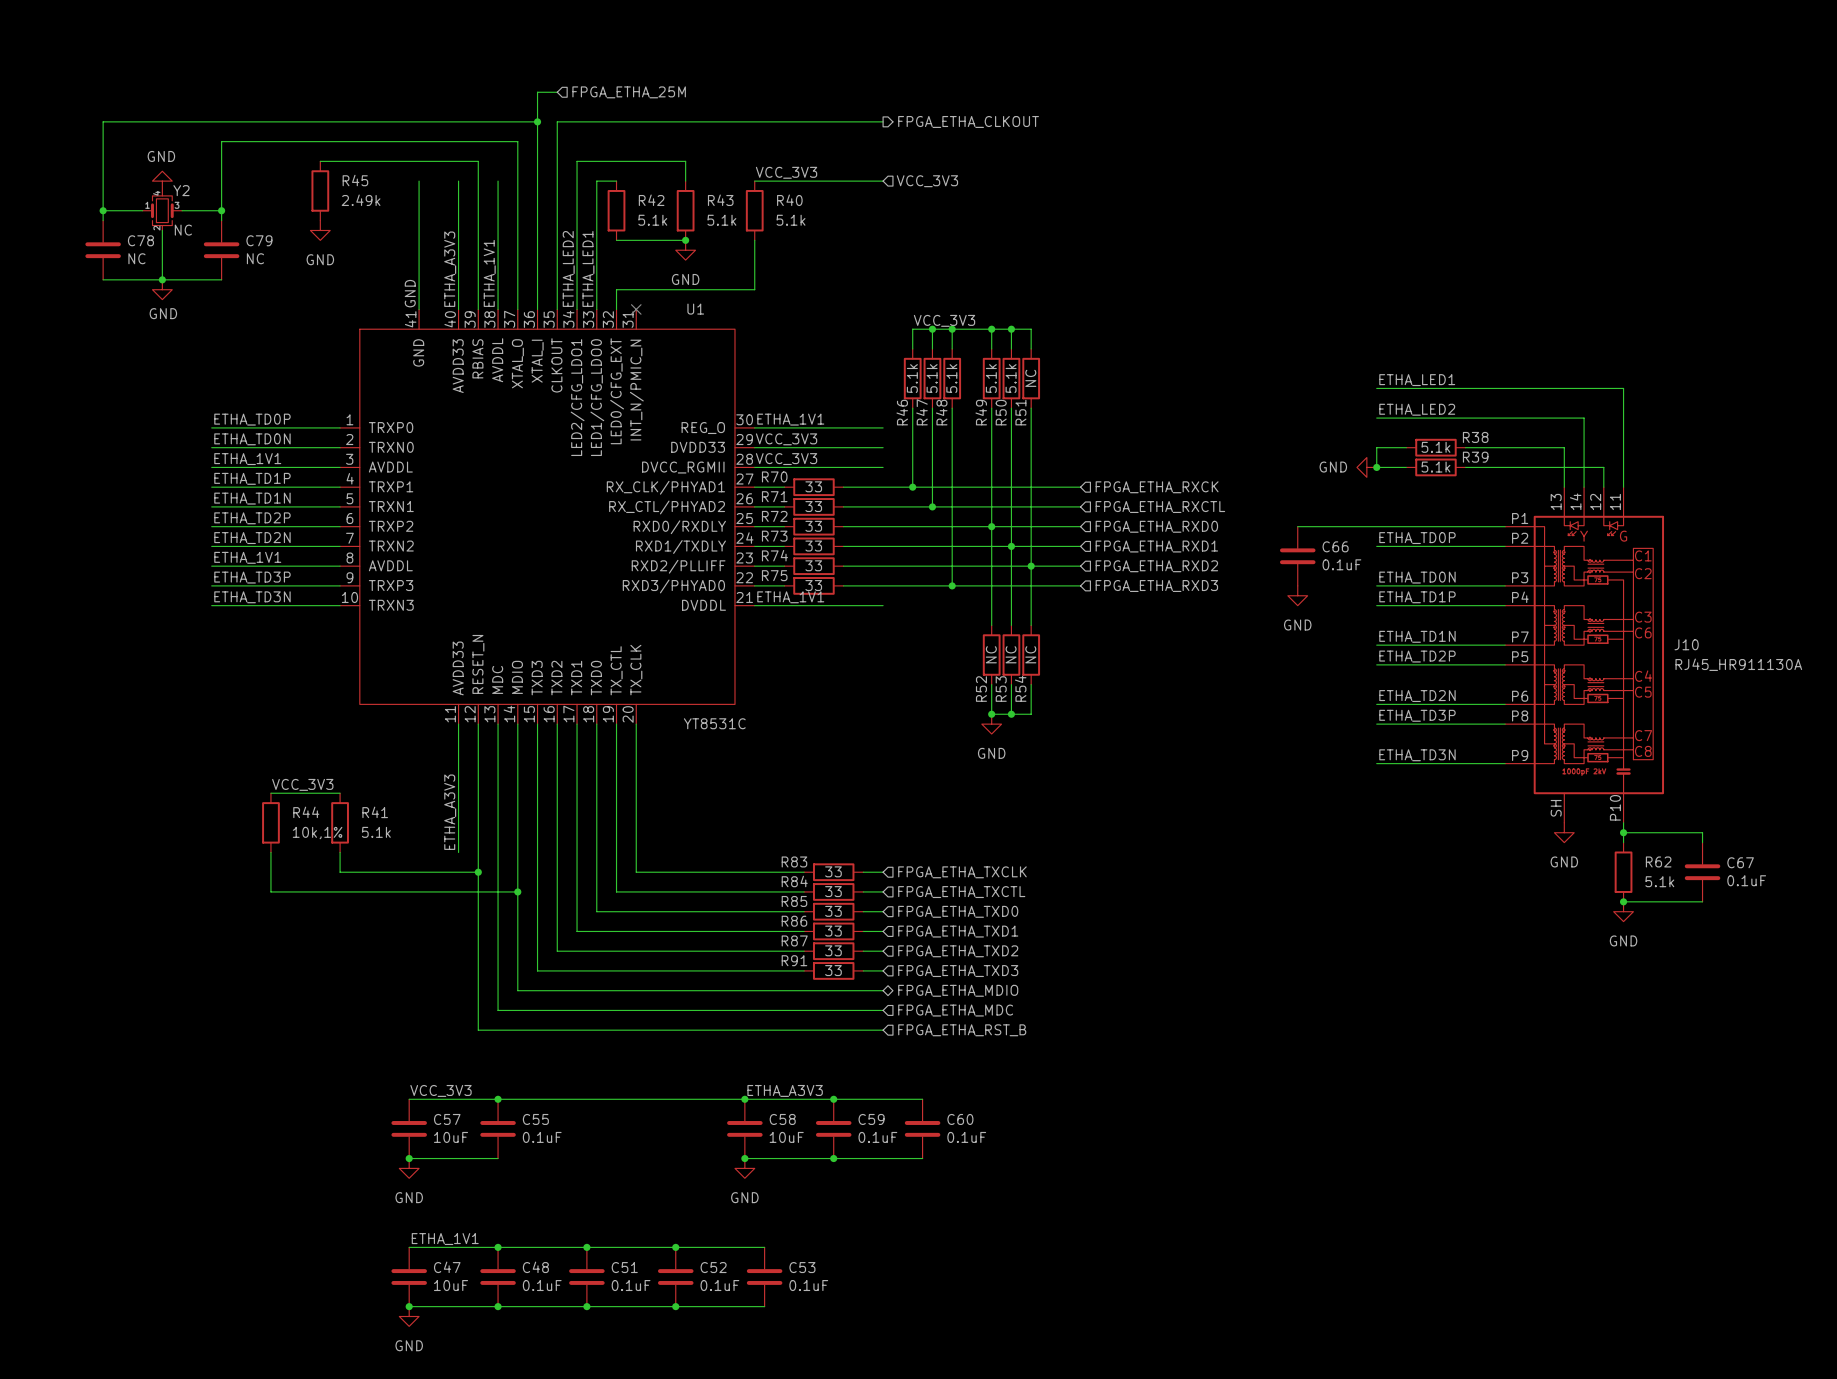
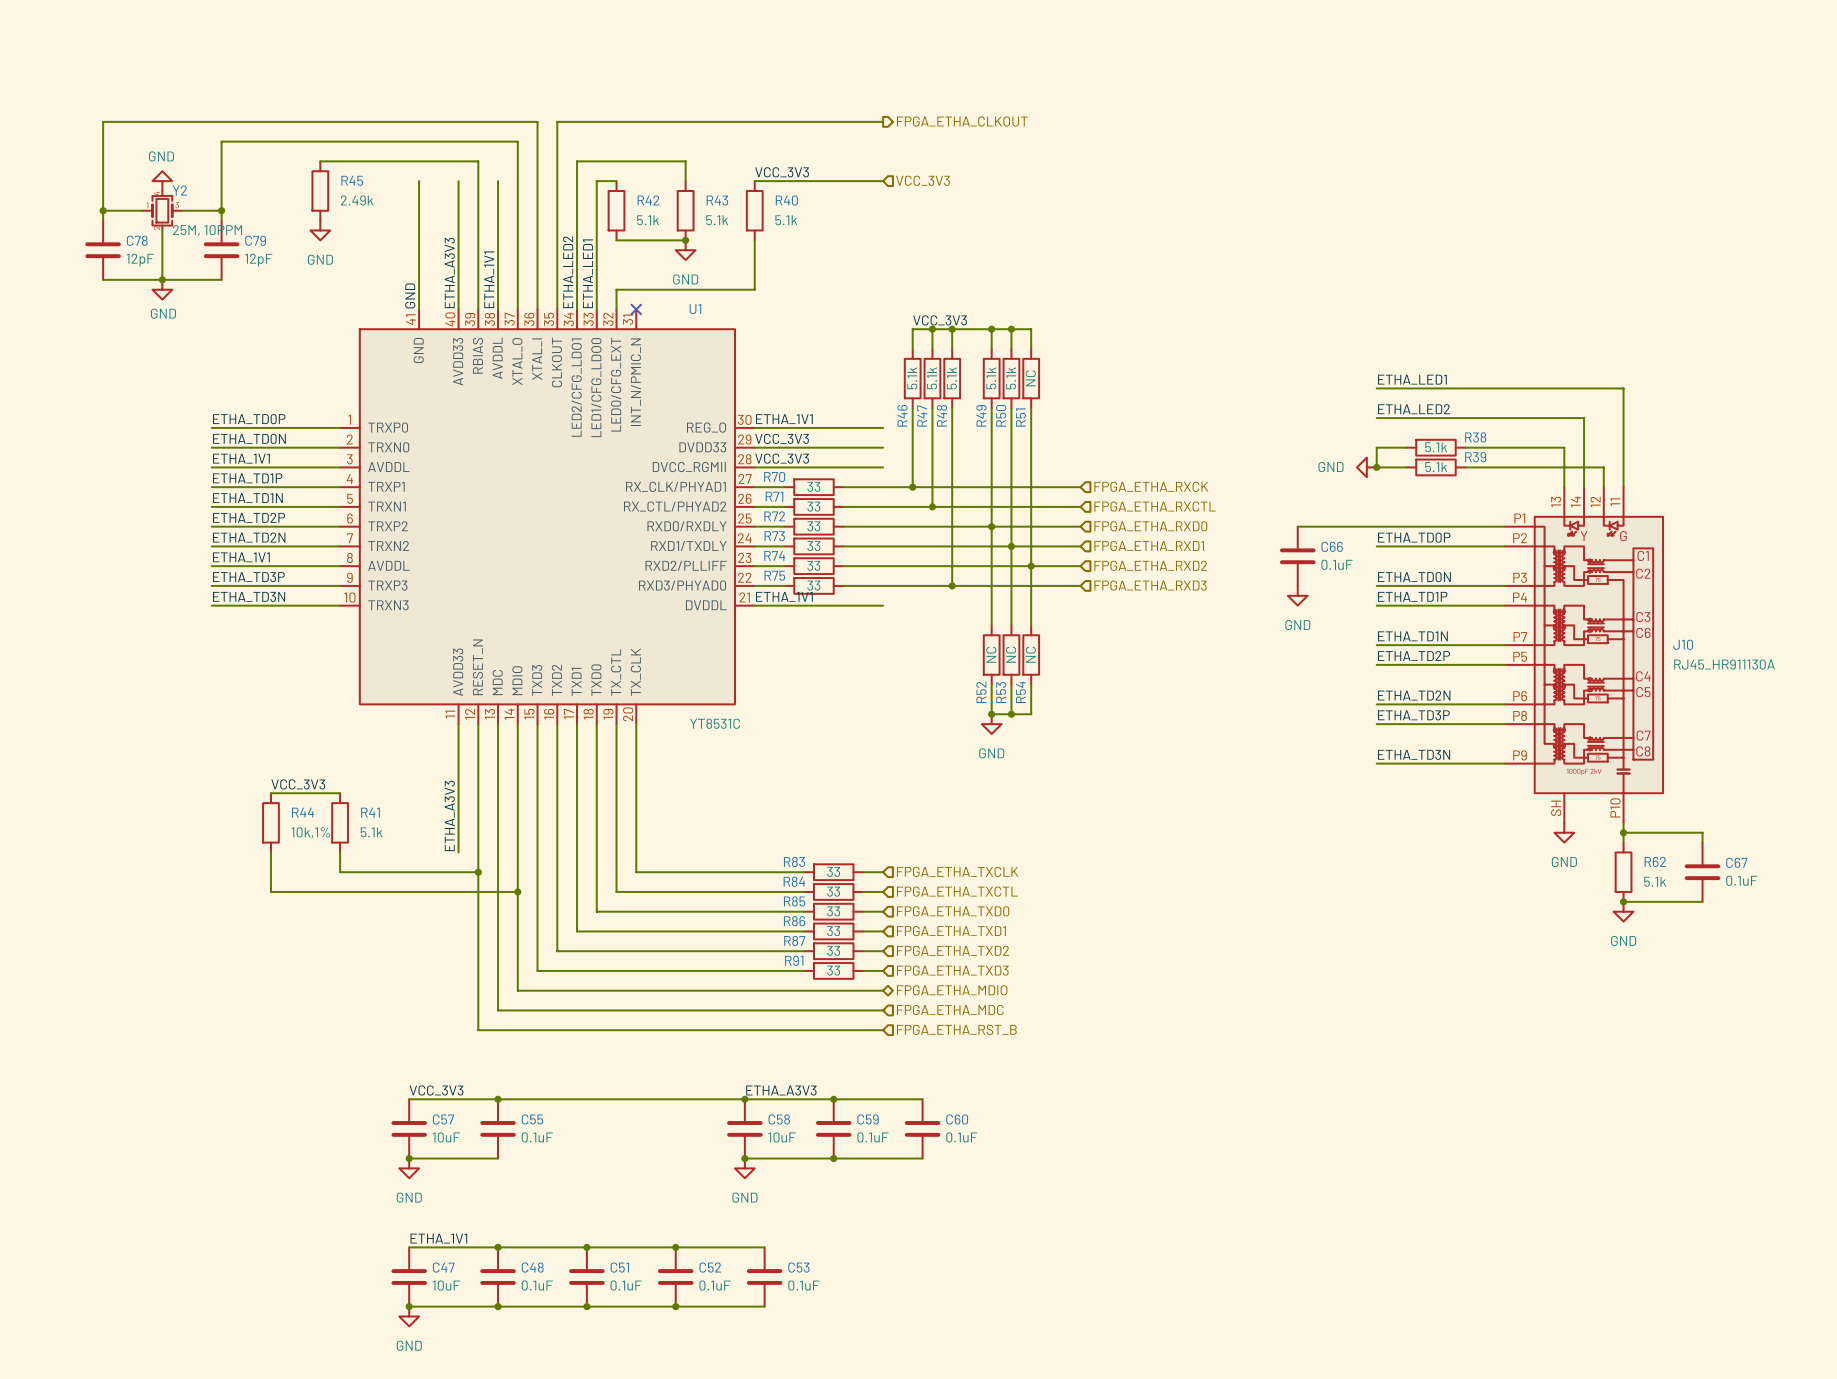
wire: (557, 92) (537, 92) (537, 121) -> none
hierarchical label: FPGA_ETHA_25M (629, 92) -> none
junction: (537, 121) -> none
Y2 value: NC (183, 230) -> 25M, 10PPM (207, 230)
C78 value: NC (136, 258) -> 12pF (140, 260)
C79 value: NC (255, 258) -> 12pF (258, 260)

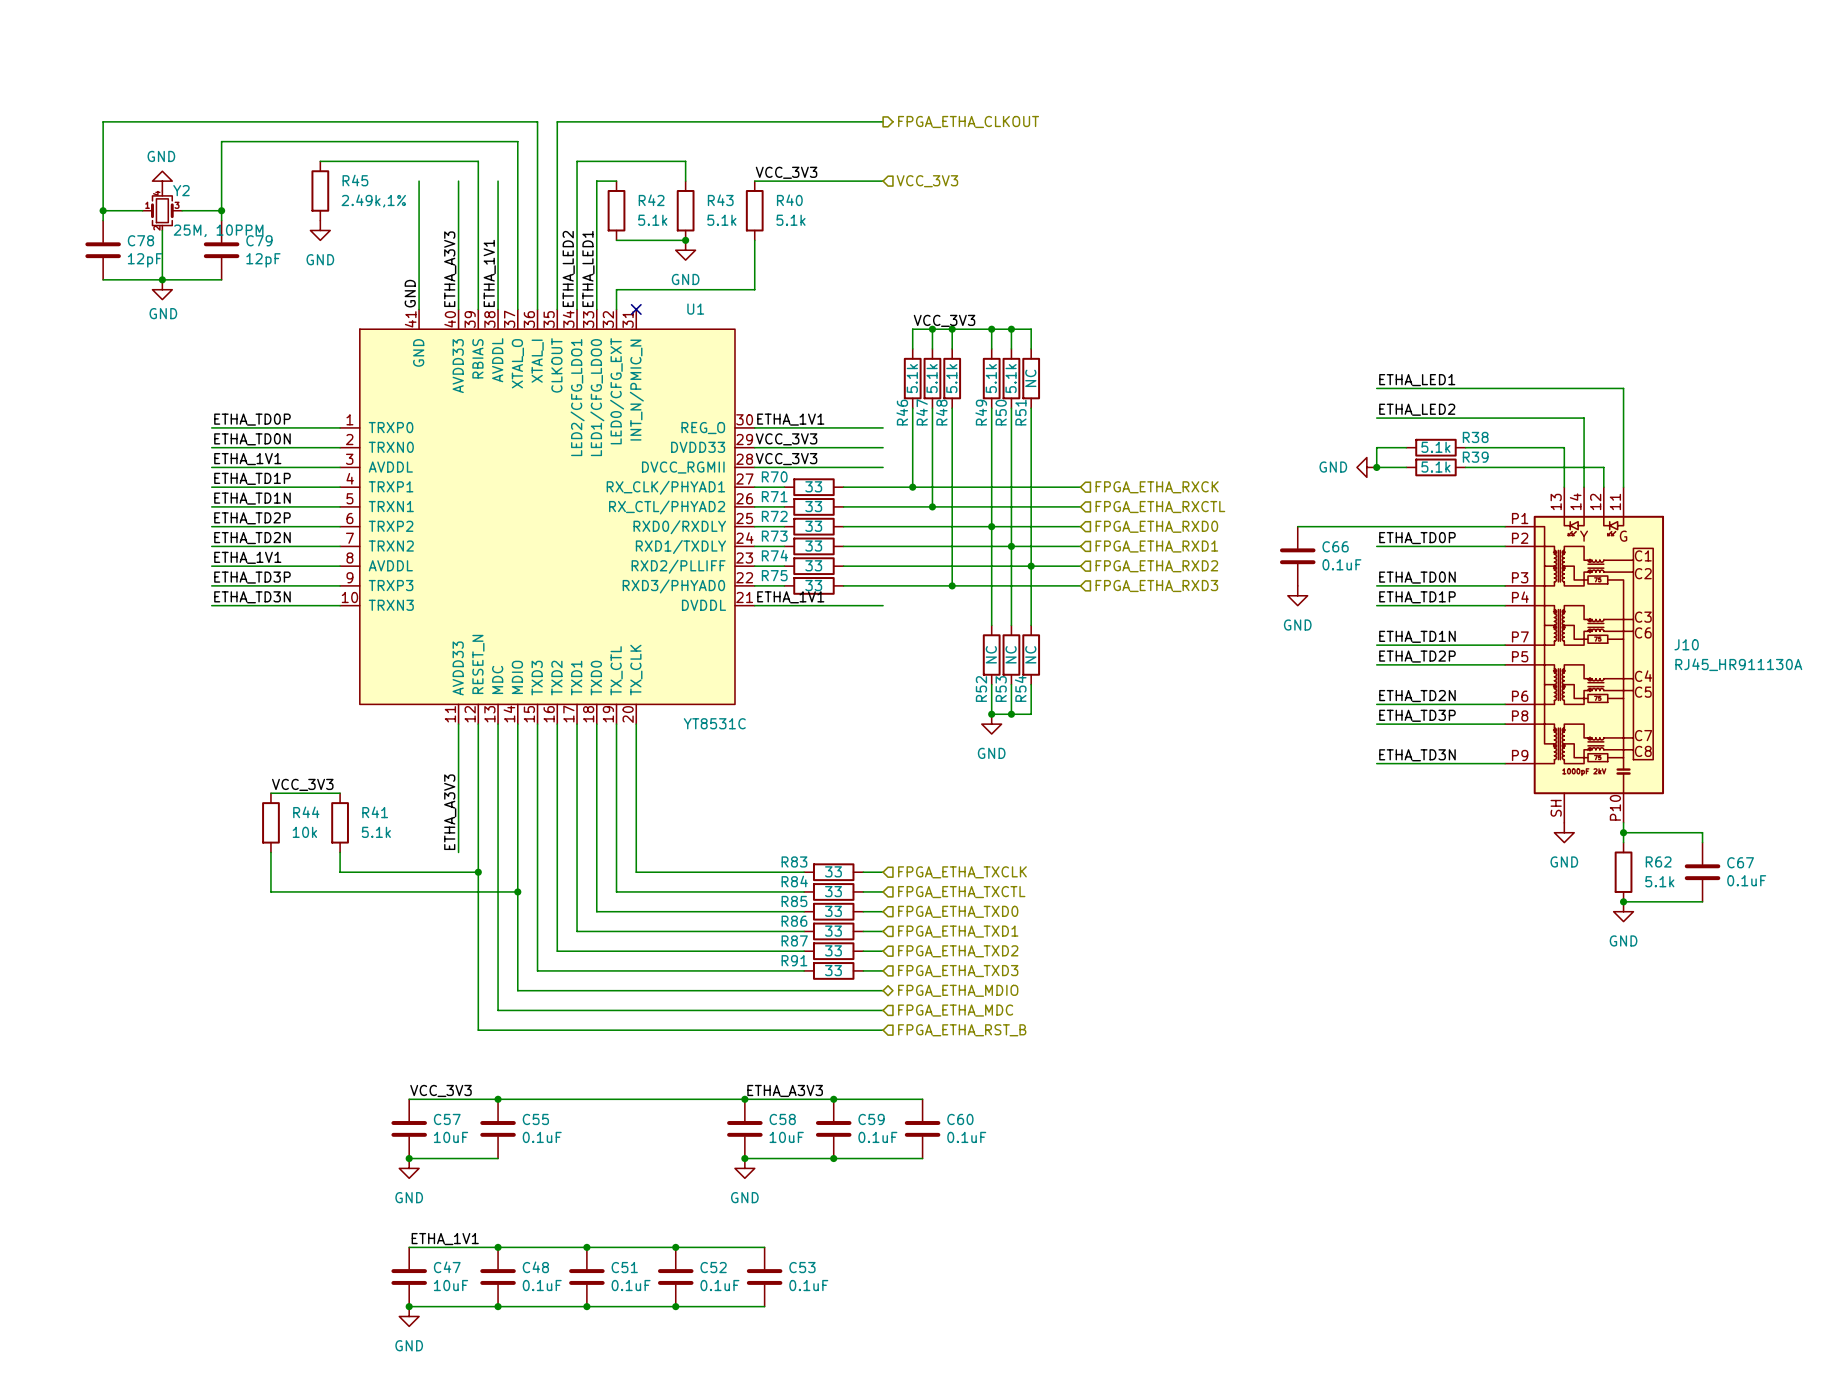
R45 value: 2.49k (357, 200) -> 2.49k,1% (373, 200)
R44 value: 10k,1% (310, 832) -> 10k (304, 832)

